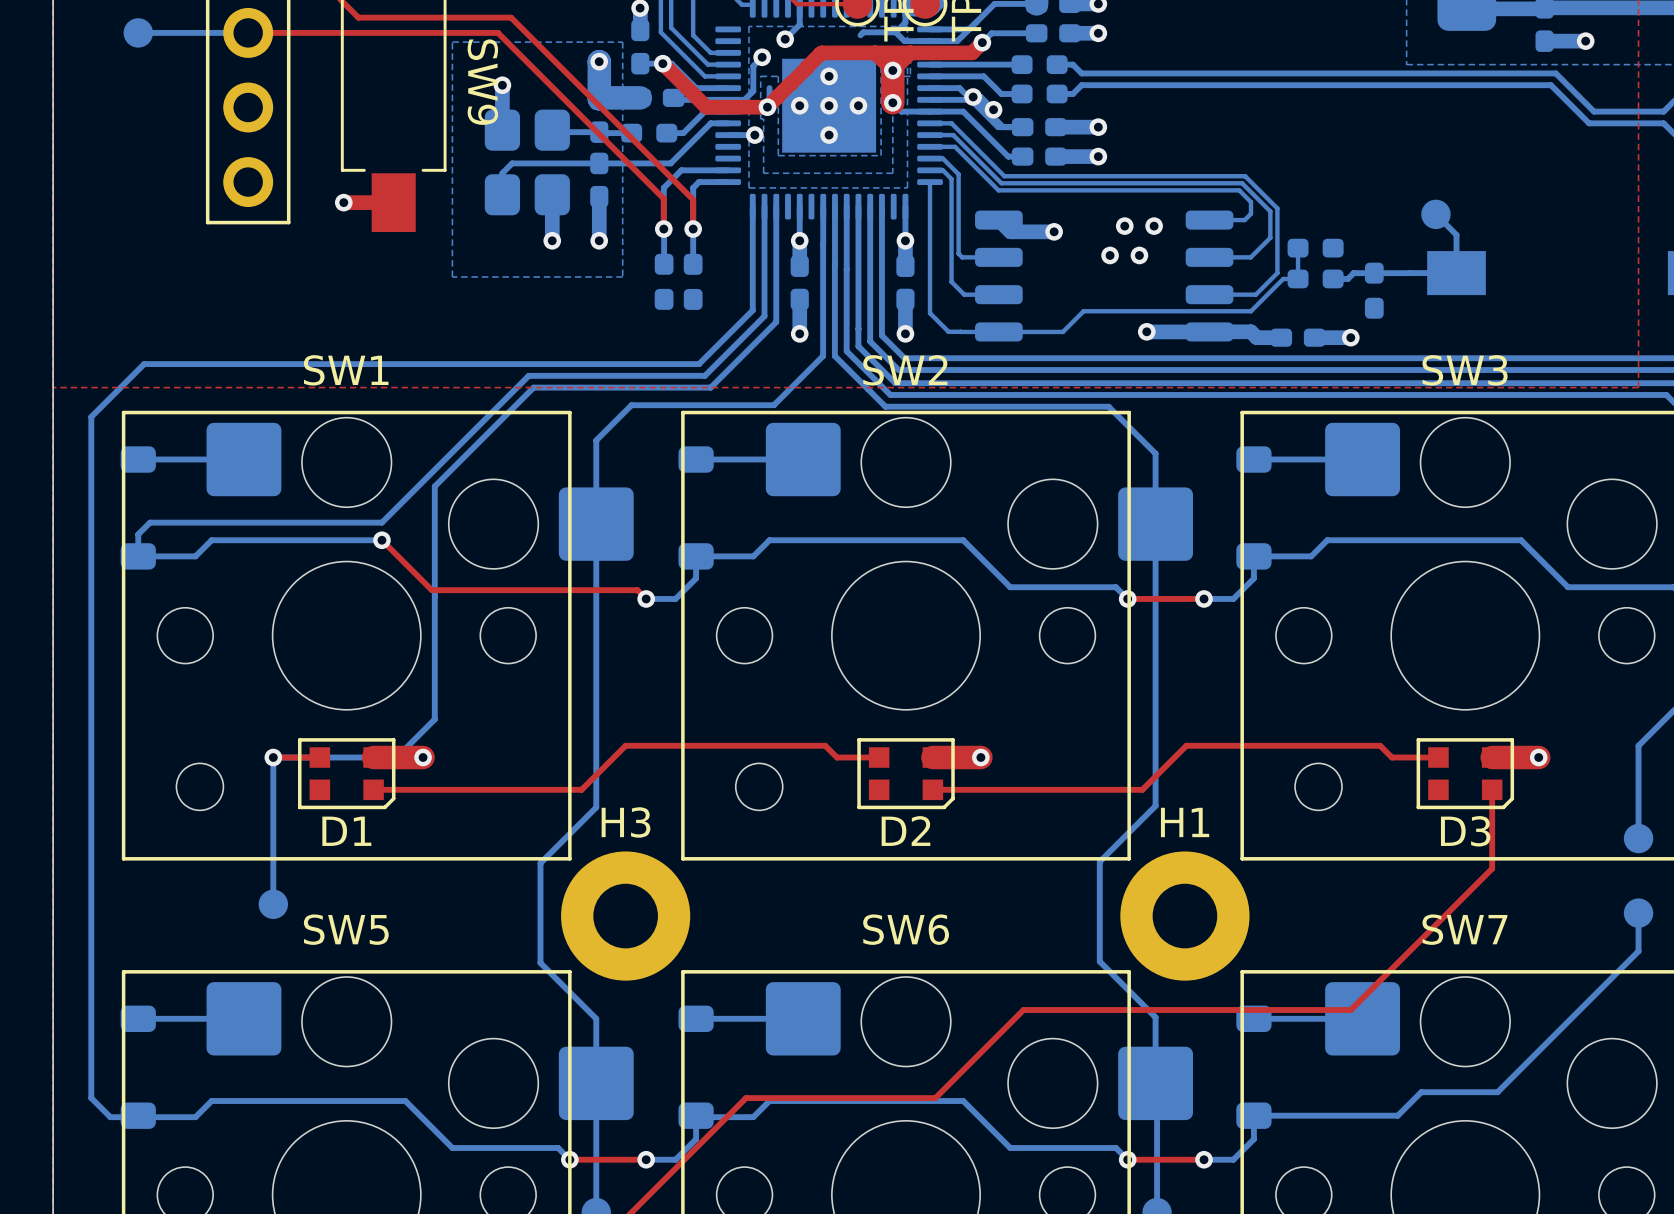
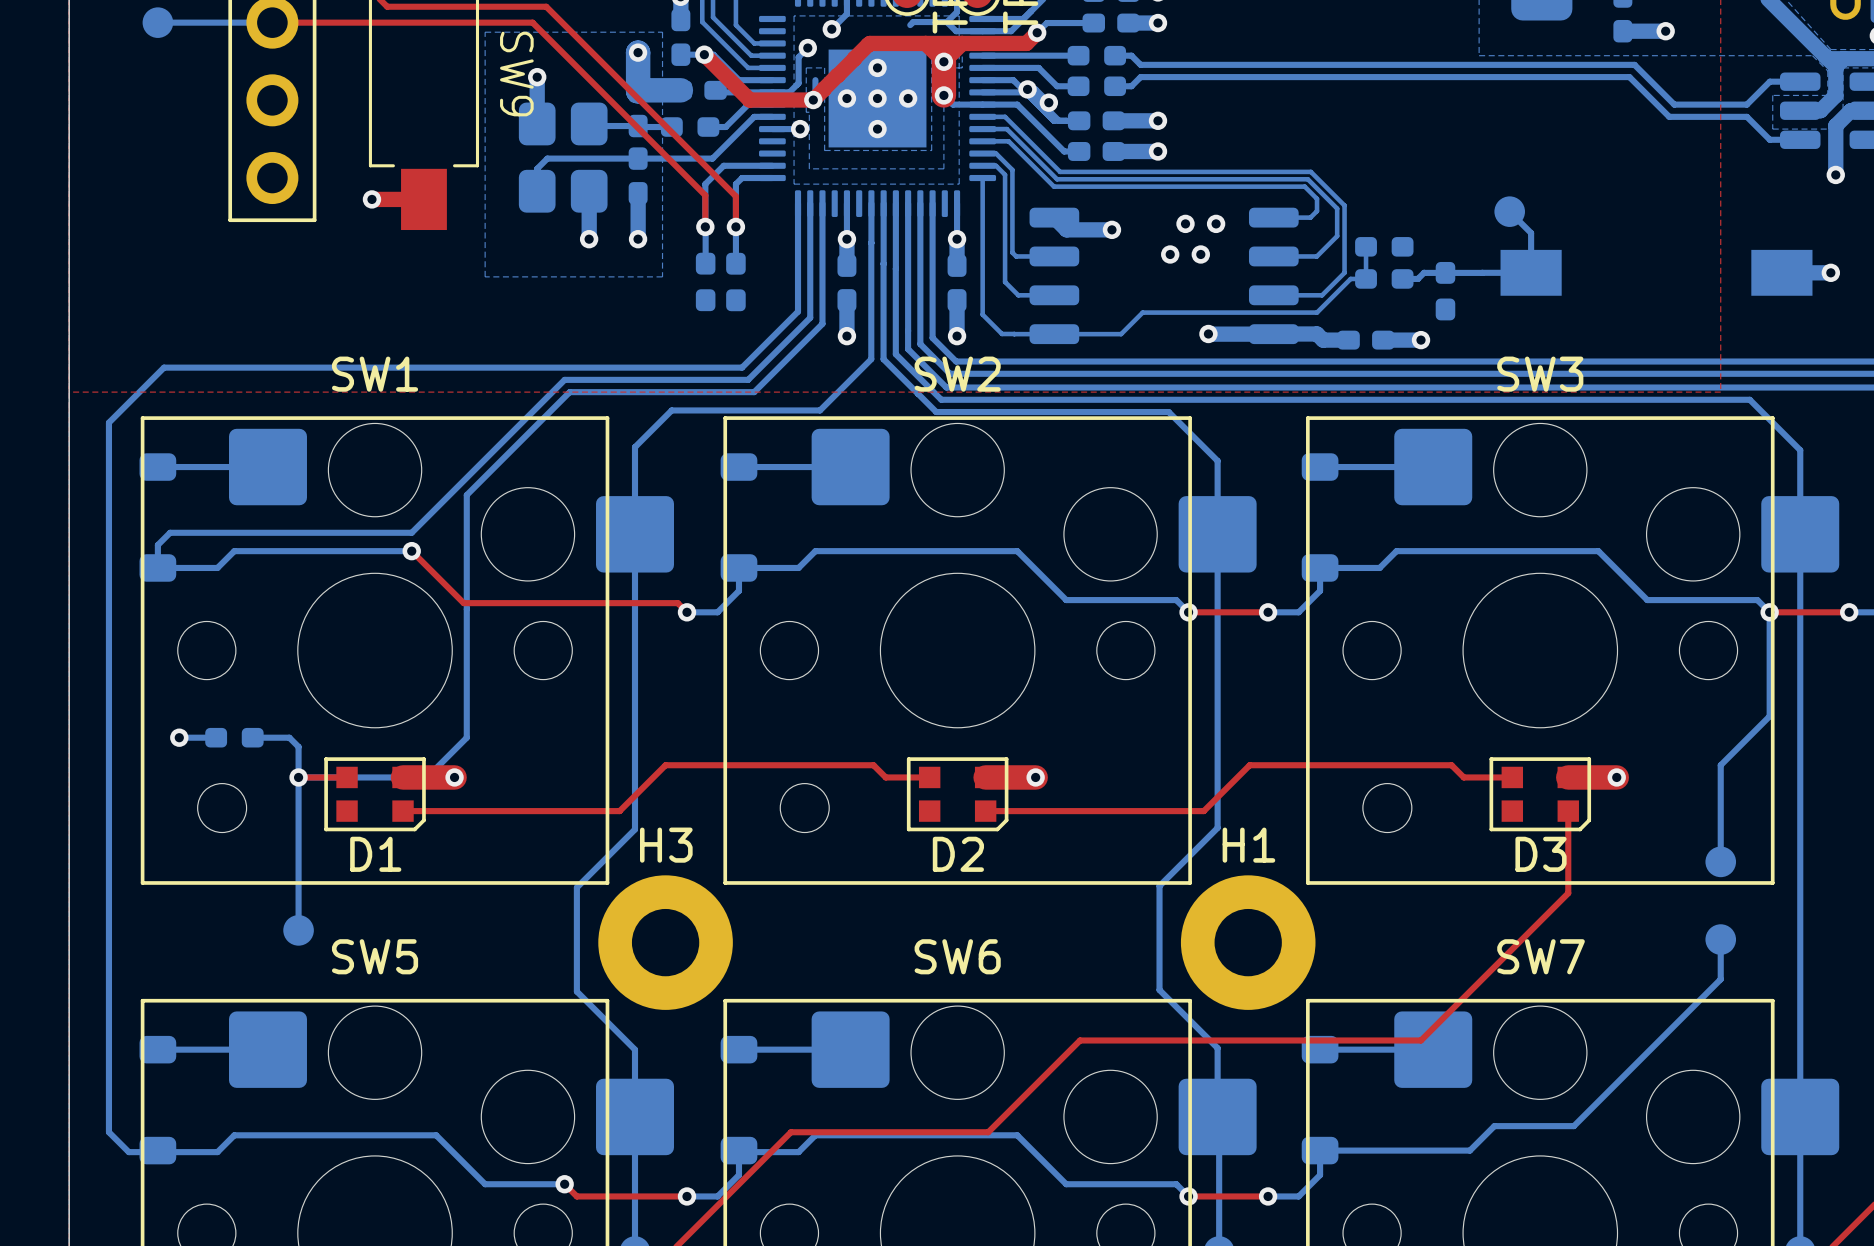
bottom track: none -> (179, 737) (216, 737)
via: none -> (179, 737)
part: none -> (234, 737)
bottom track: none -> (252, 737) (289, 737) (298, 746) (298, 777)
top track: none -> (564, 1184) (576, 1196) (607, 1196)
bottom track: (528, 1147) (558, 1147) (569, 1159) -> none
via position: (569, 1159) -> (564, 1184)

